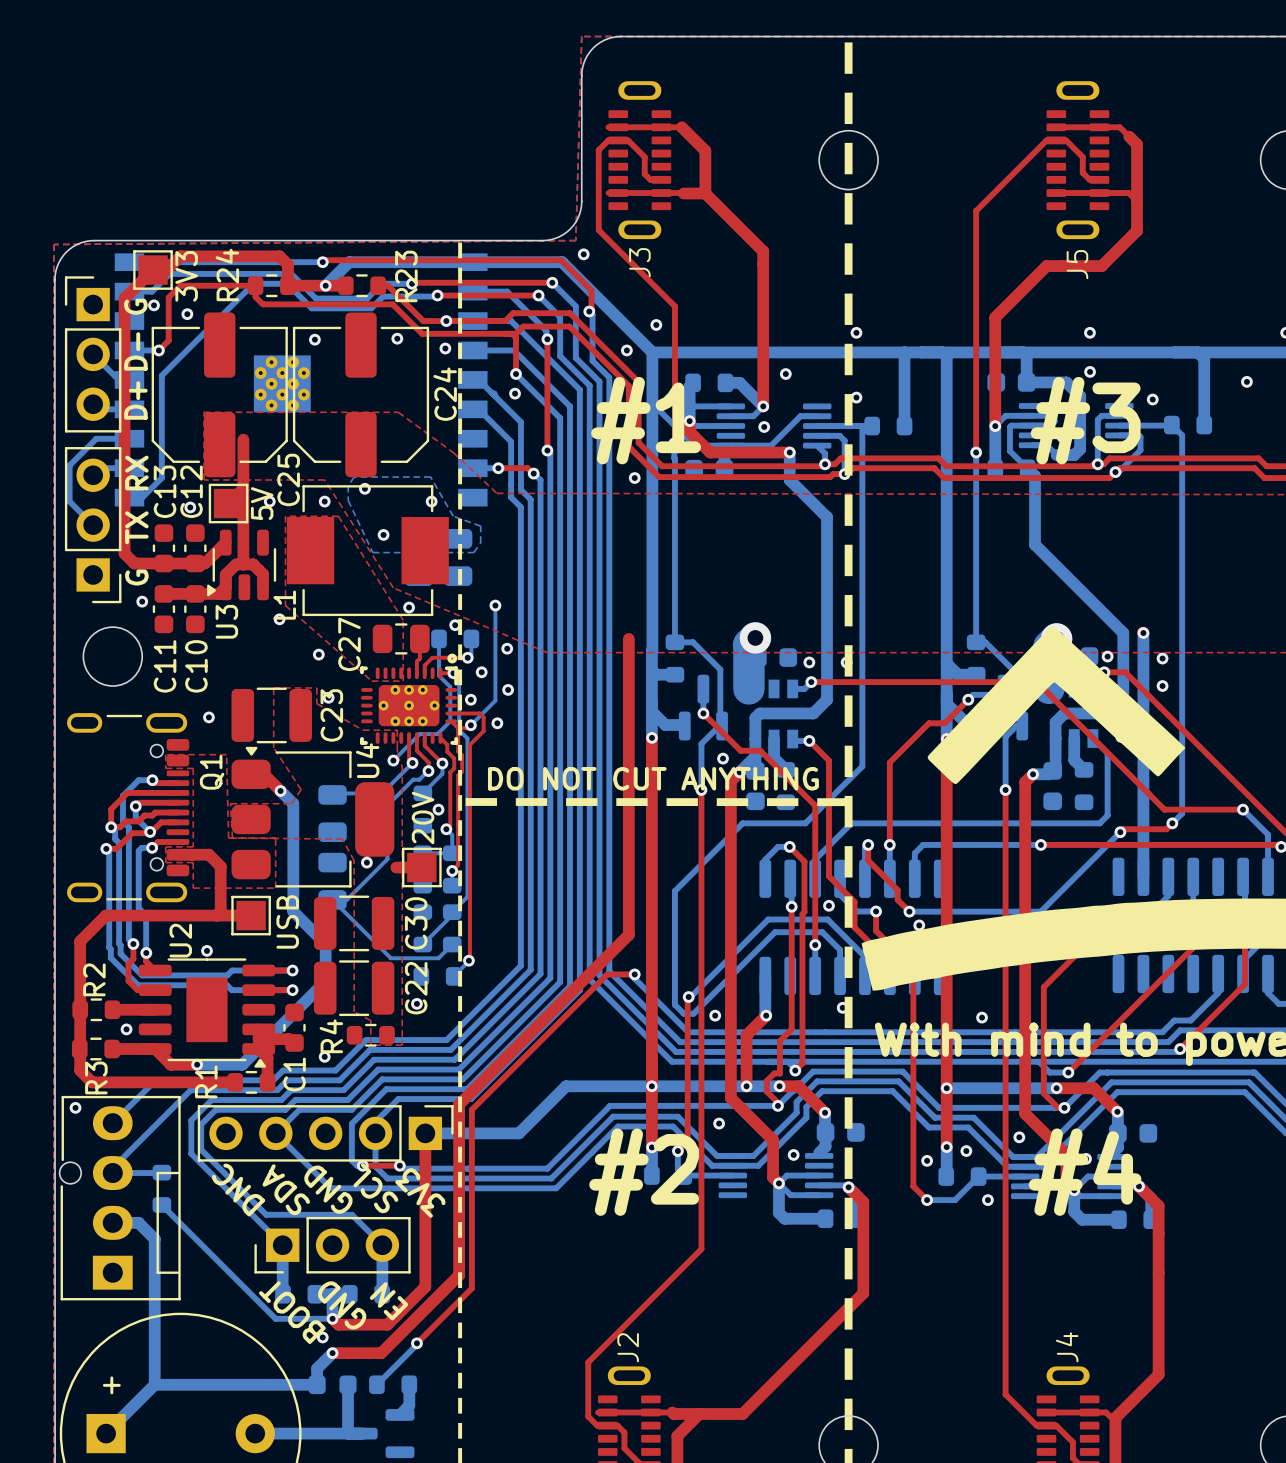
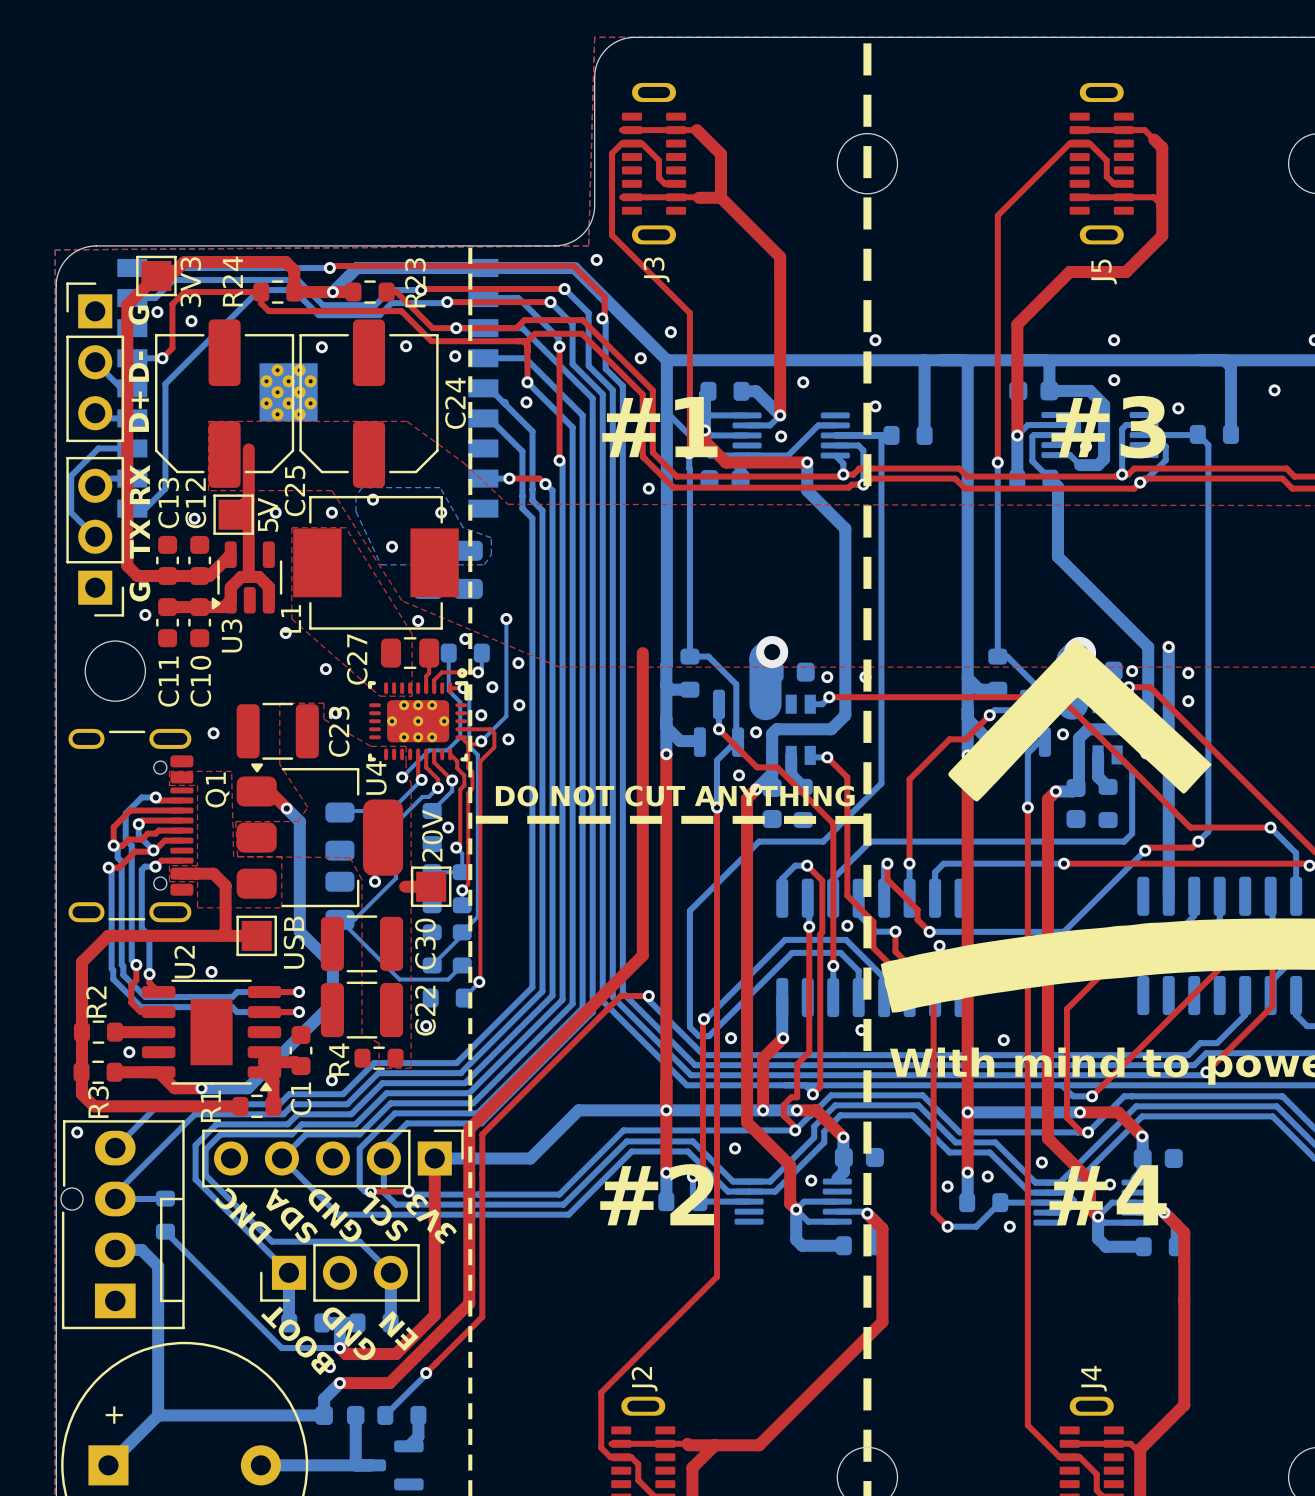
via: none -> (756, 732)
via: none -> (1062, 734)

